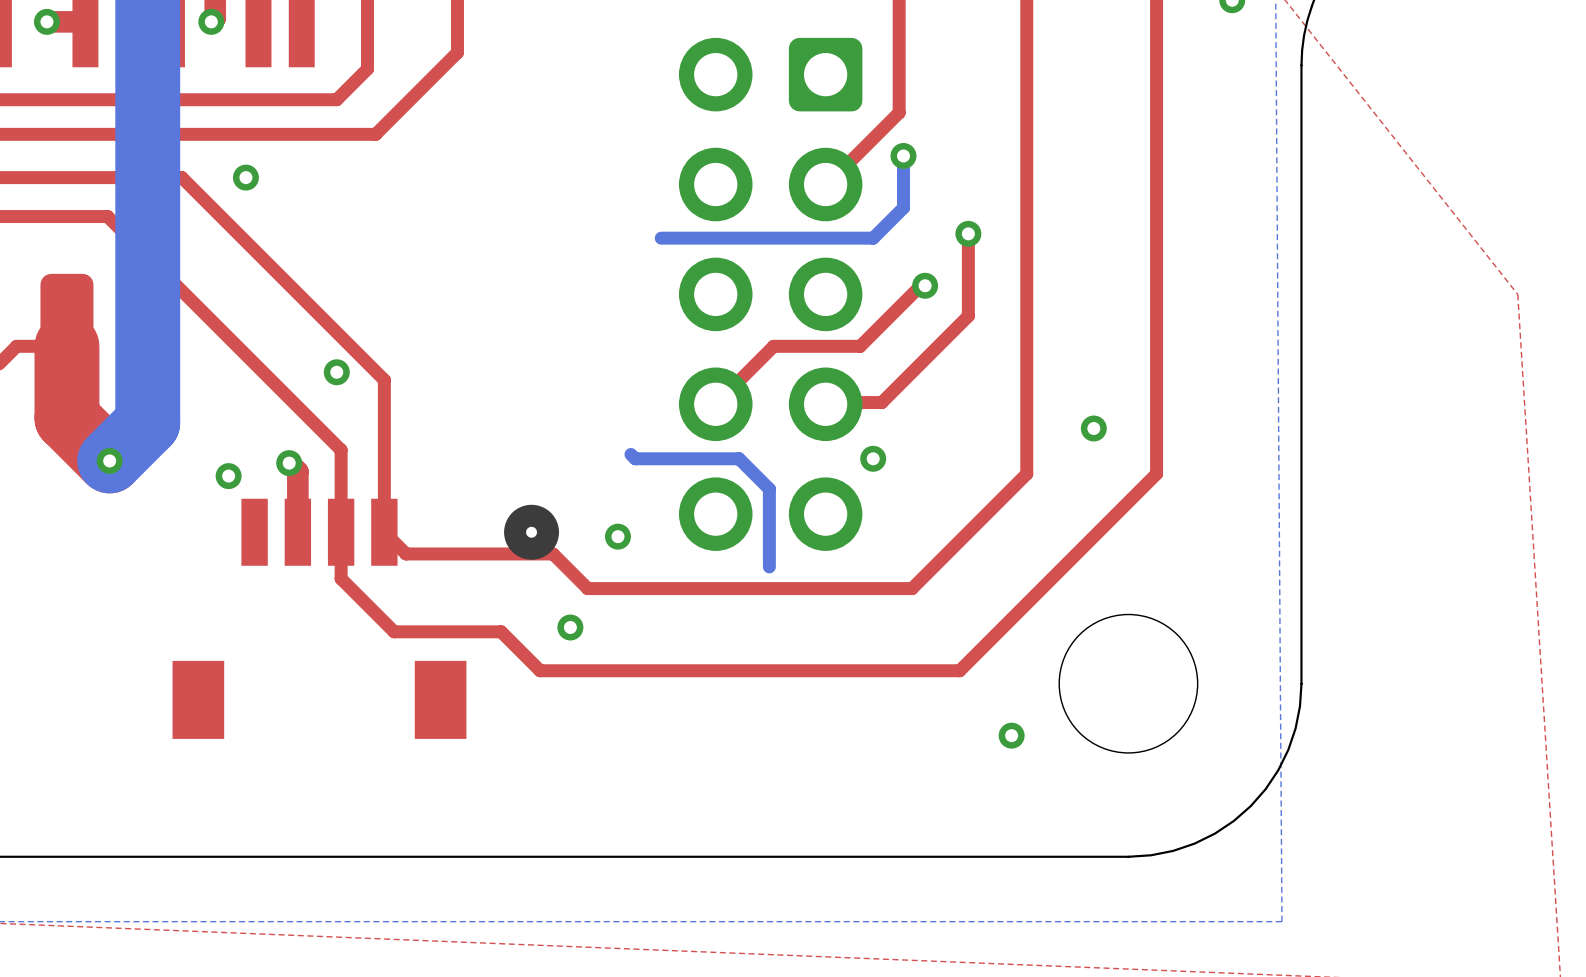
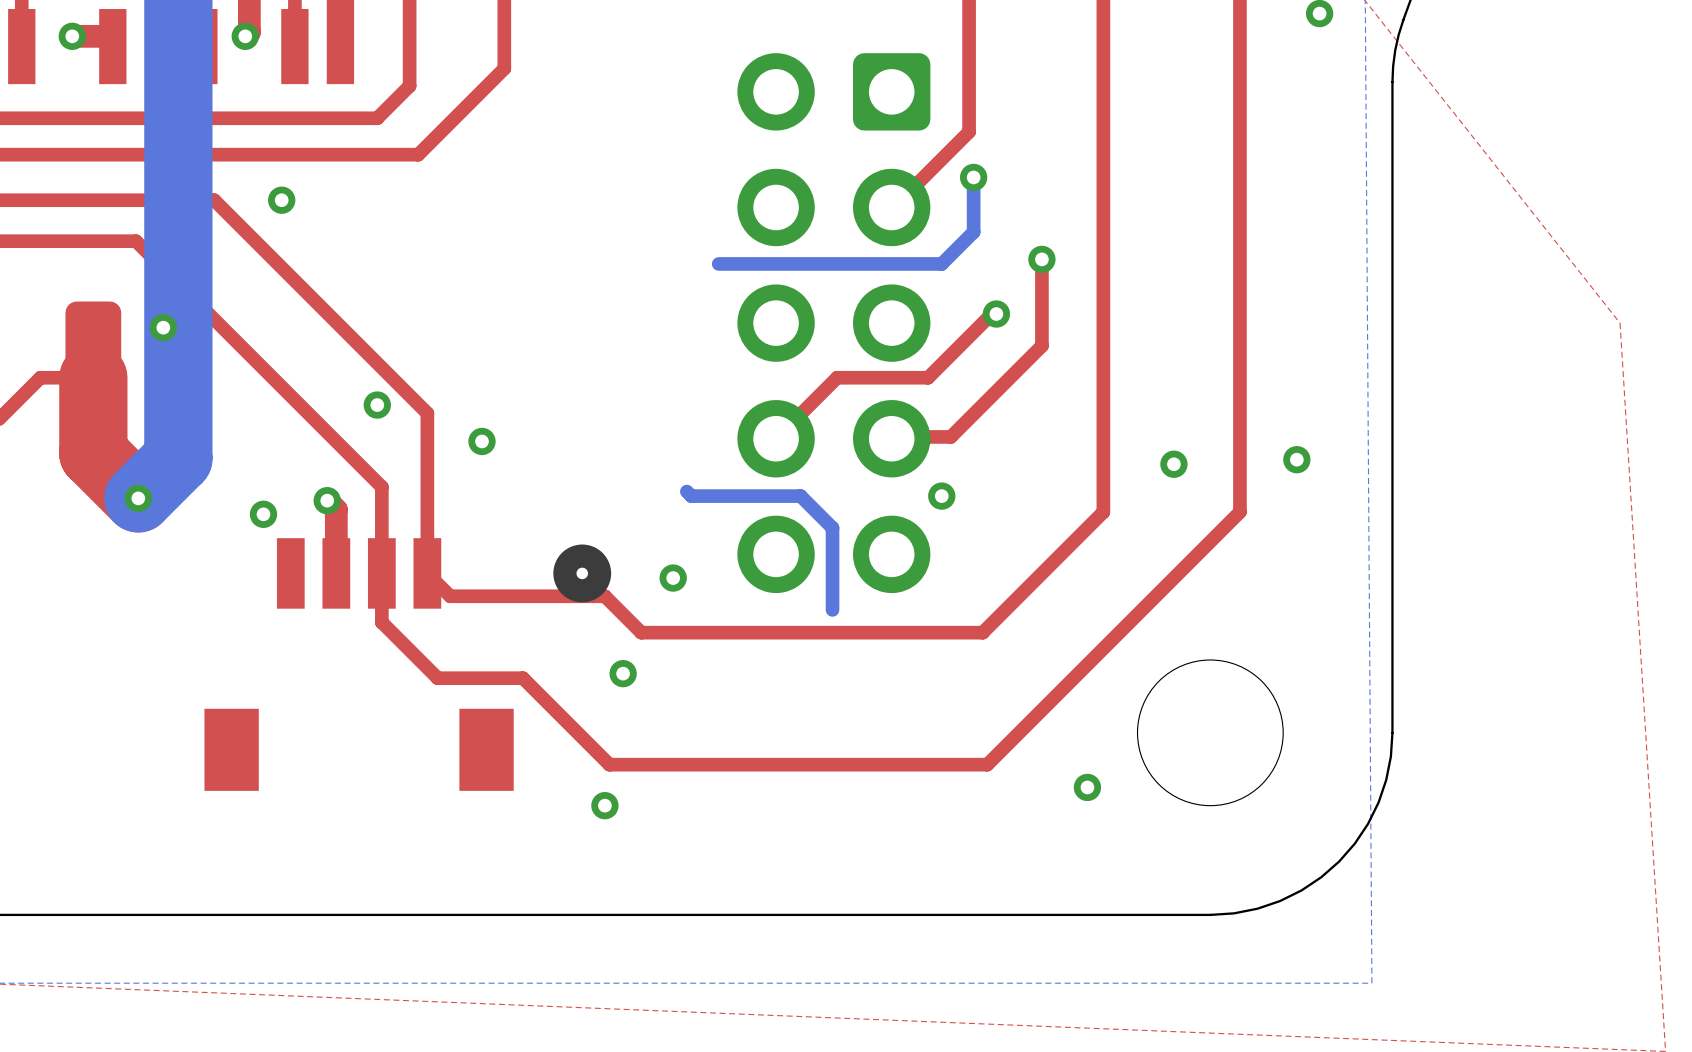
via: none -> (163, 327)
via: none -> (482, 441)
via: none -> (1296, 459)
top track: (475, 631) (501, 631) (540, 670) (959, 670) -> (522, 678) (609, 764) (987, 764) (1032, 719)
via: none -> (604, 805)

